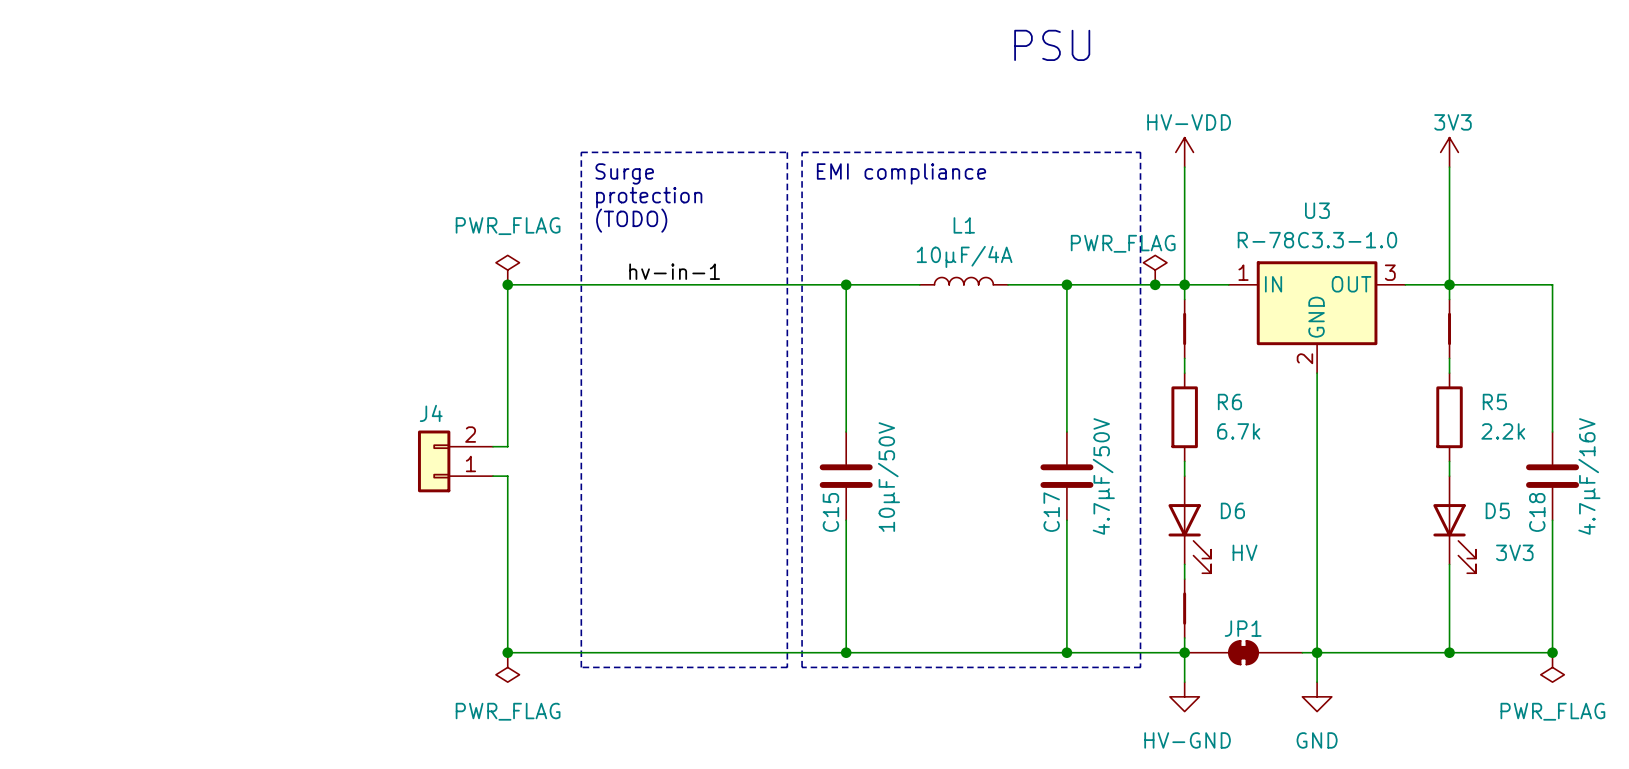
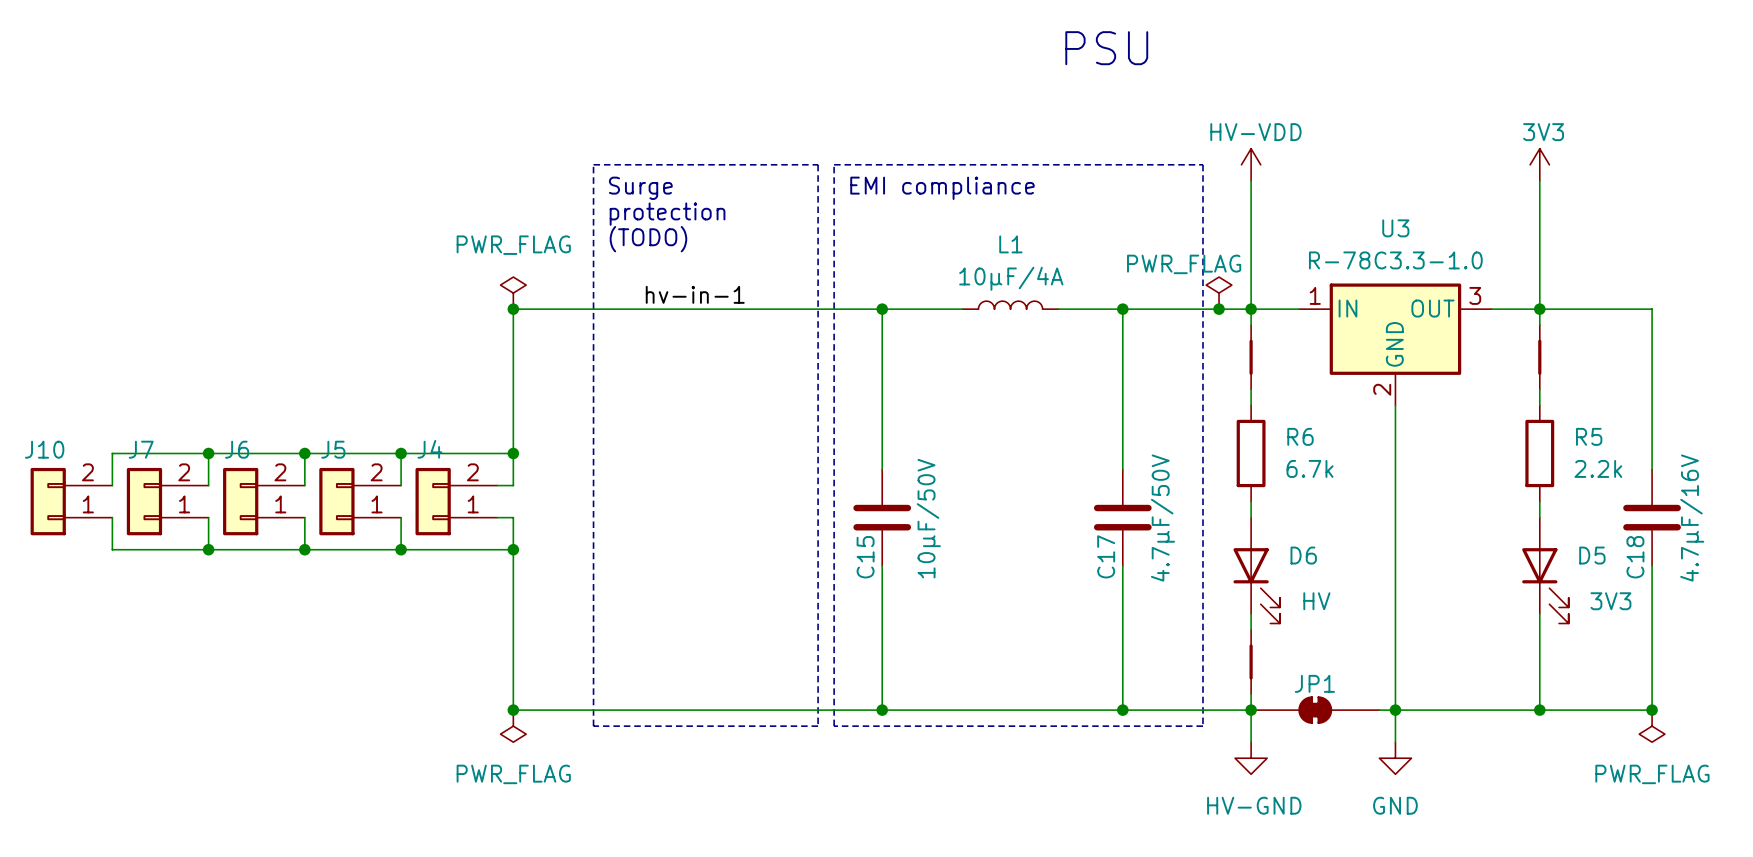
wire: none -> (208, 453) (208, 485)
junction: none -> (208, 453)
wire: none -> (304, 453) (304, 485)
junction: none -> (304, 453)
wire: none -> (401, 453) (401, 485)
junction: none -> (401, 453)
wire: none -> (513, 453) (112, 453) (112, 485)
junction: none -> (513, 453)
J10: none -> (71, 501)
J7: none -> (167, 501)
J6: none -> (263, 501)
J5: none -> (360, 501)
wire: none -> (112, 517) (112, 549) (513, 549)
wire: none -> (208, 517) (208, 549)
wire: none -> (304, 517) (304, 549)
wire: none -> (401, 517) (401, 549)
junction: none -> (208, 549)
junction: none -> (304, 549)
junction: none -> (401, 549)
junction: none -> (513, 549)

